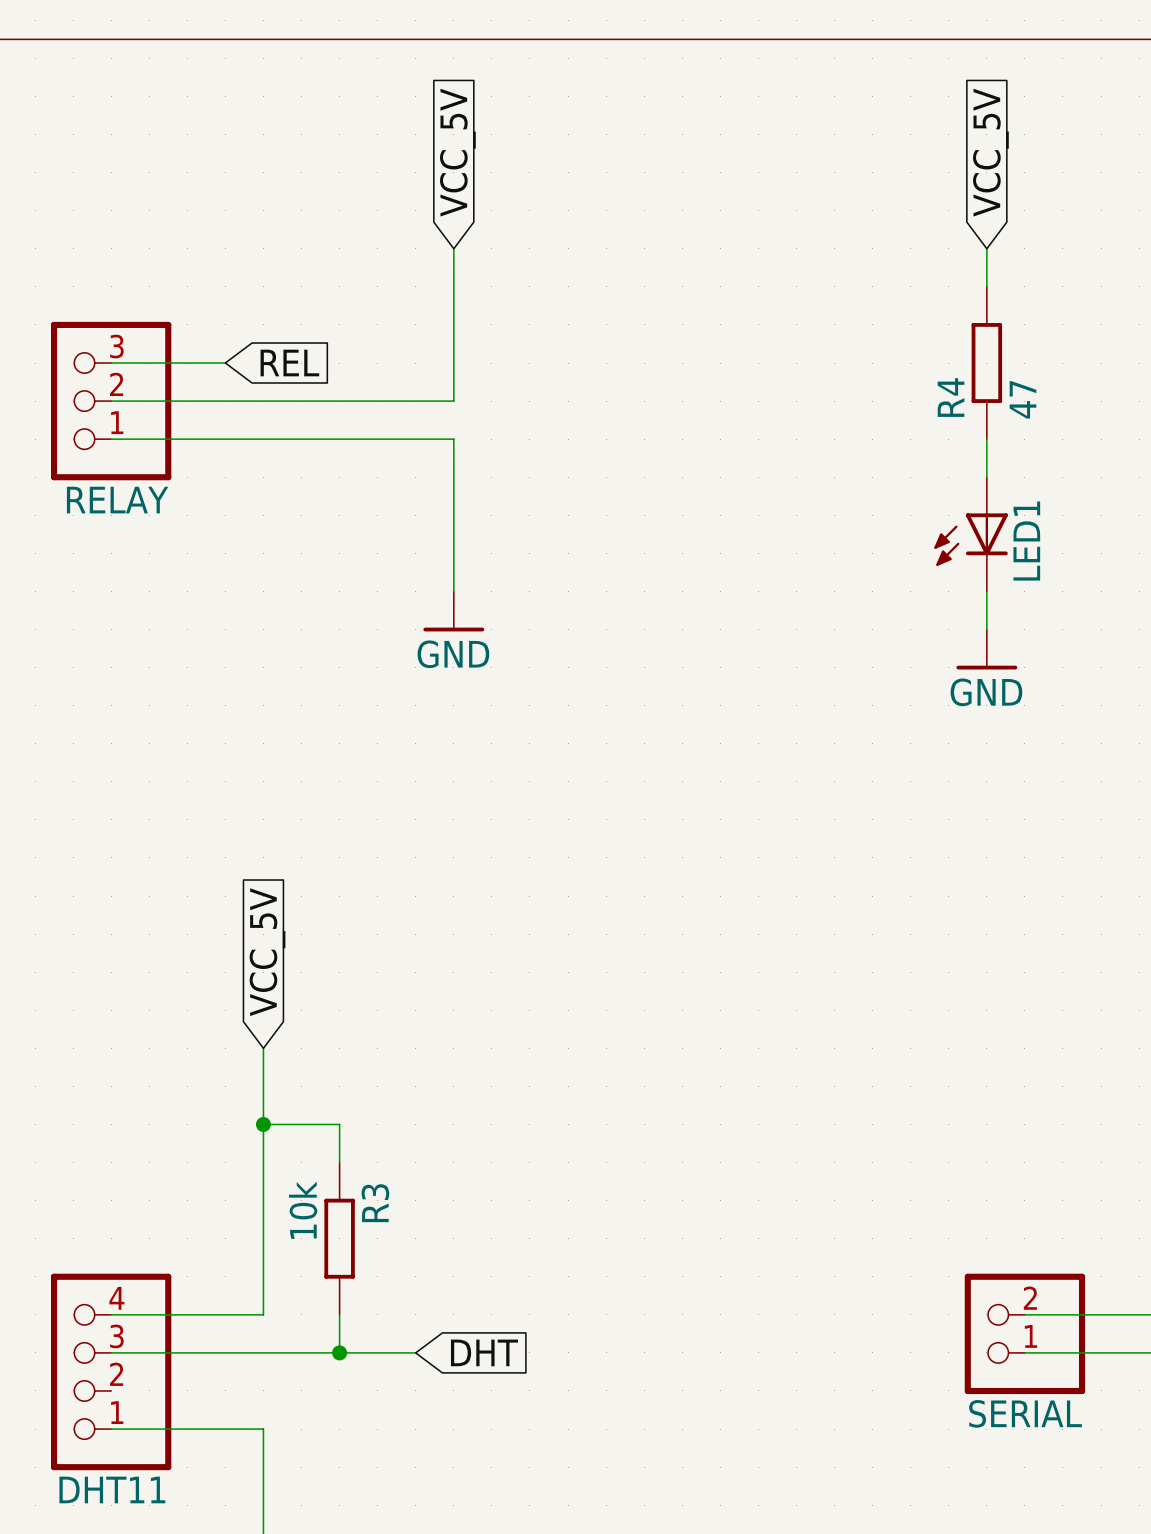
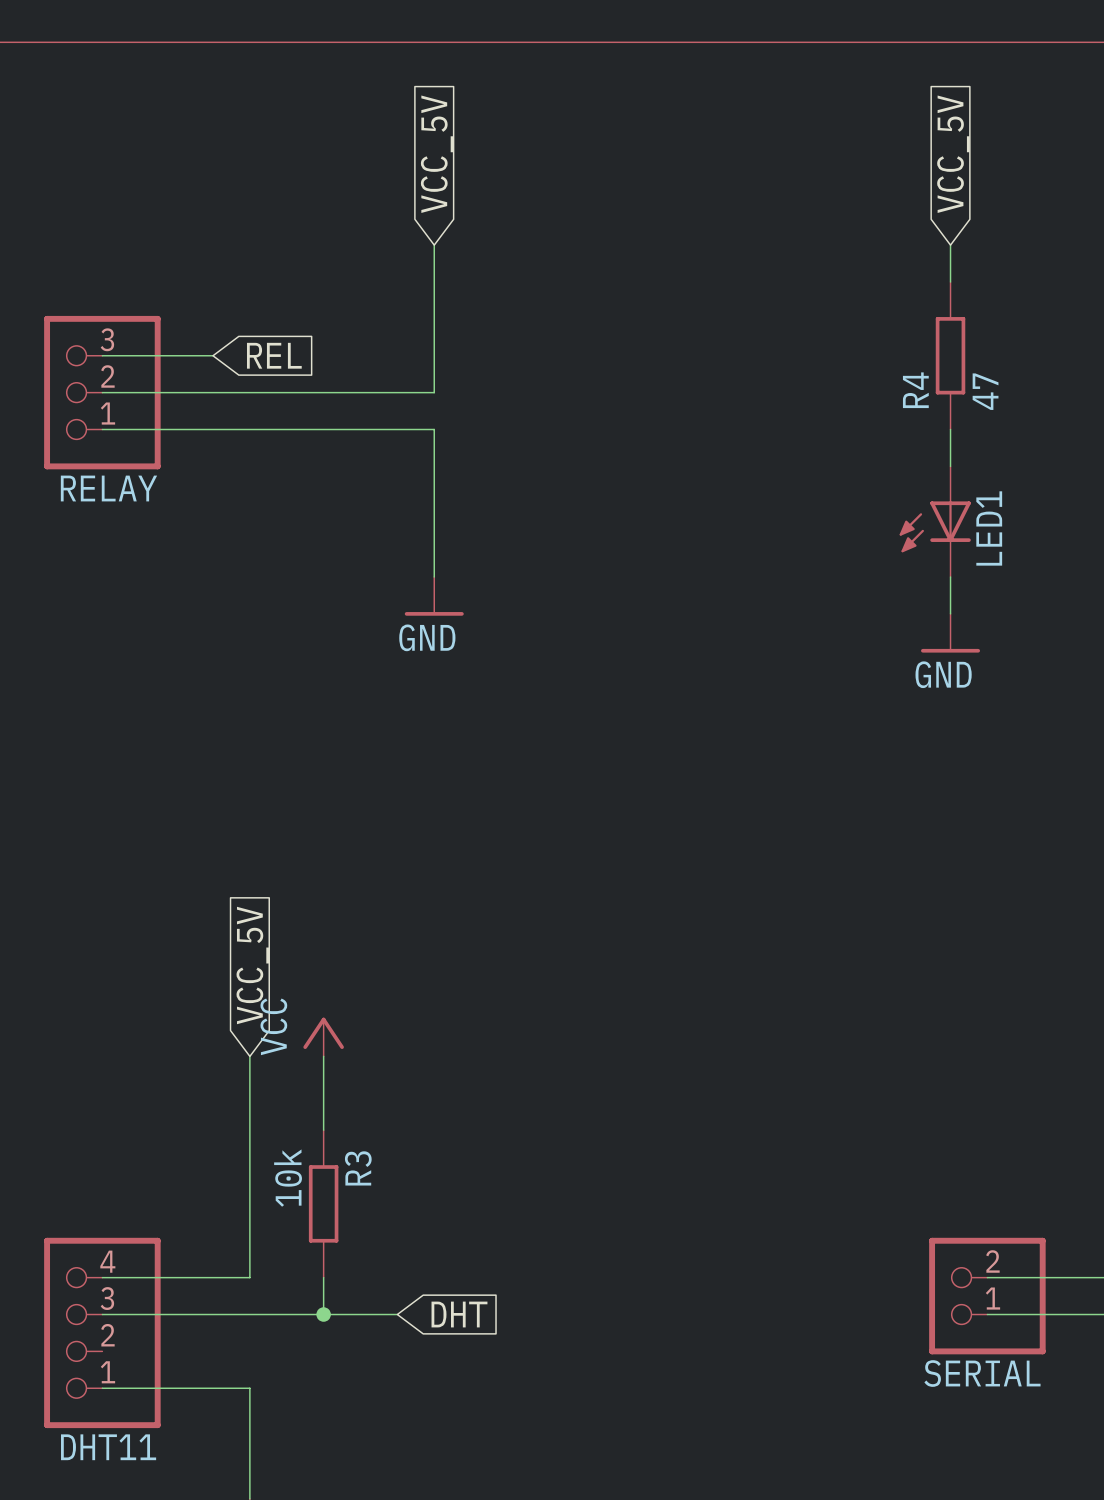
global label position: VCC_5V (267, 952) -> VCC_5V (252, 965)
wire: (263, 1048) (263, 1086) -> none
power symbol: none -> VCC (323, 1037)
wire: (263, 1124) (339, 1124) -> (323, 1056) (323, 1093)
junction: (263, 1124) -> none

